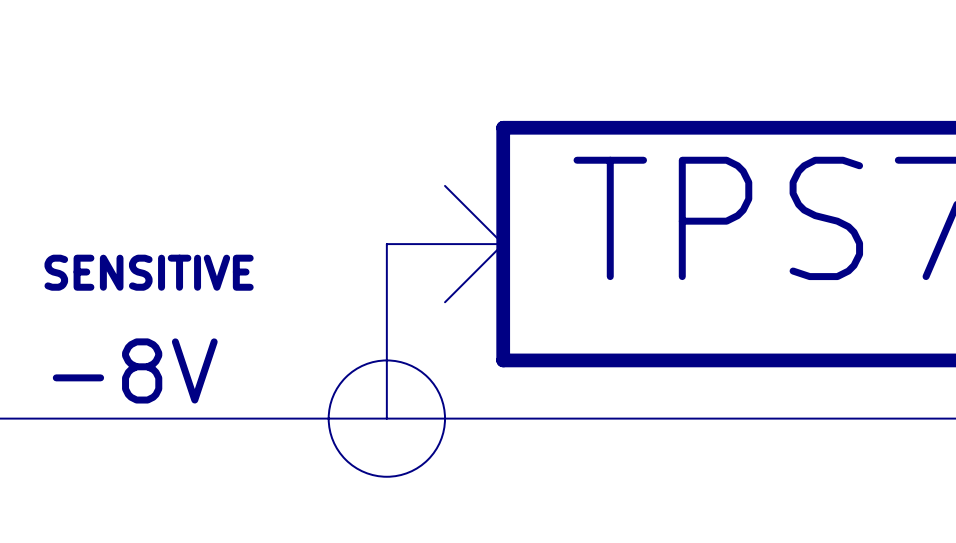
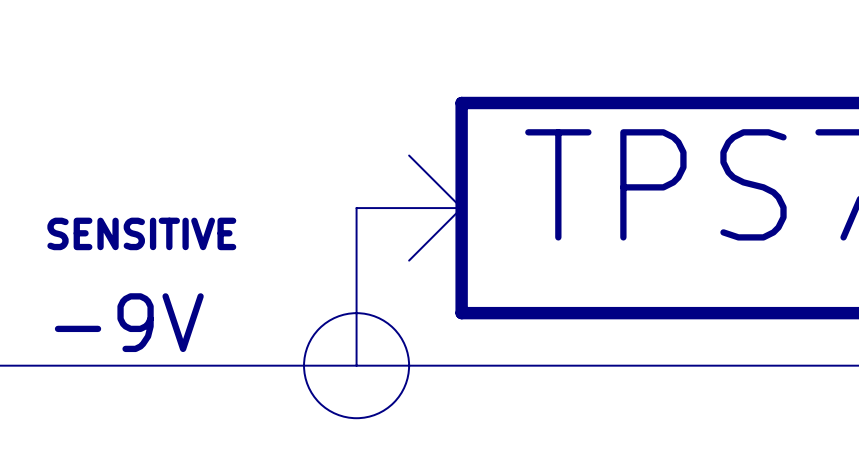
text: -8V (135, 370) -> -9V (129, 322)

